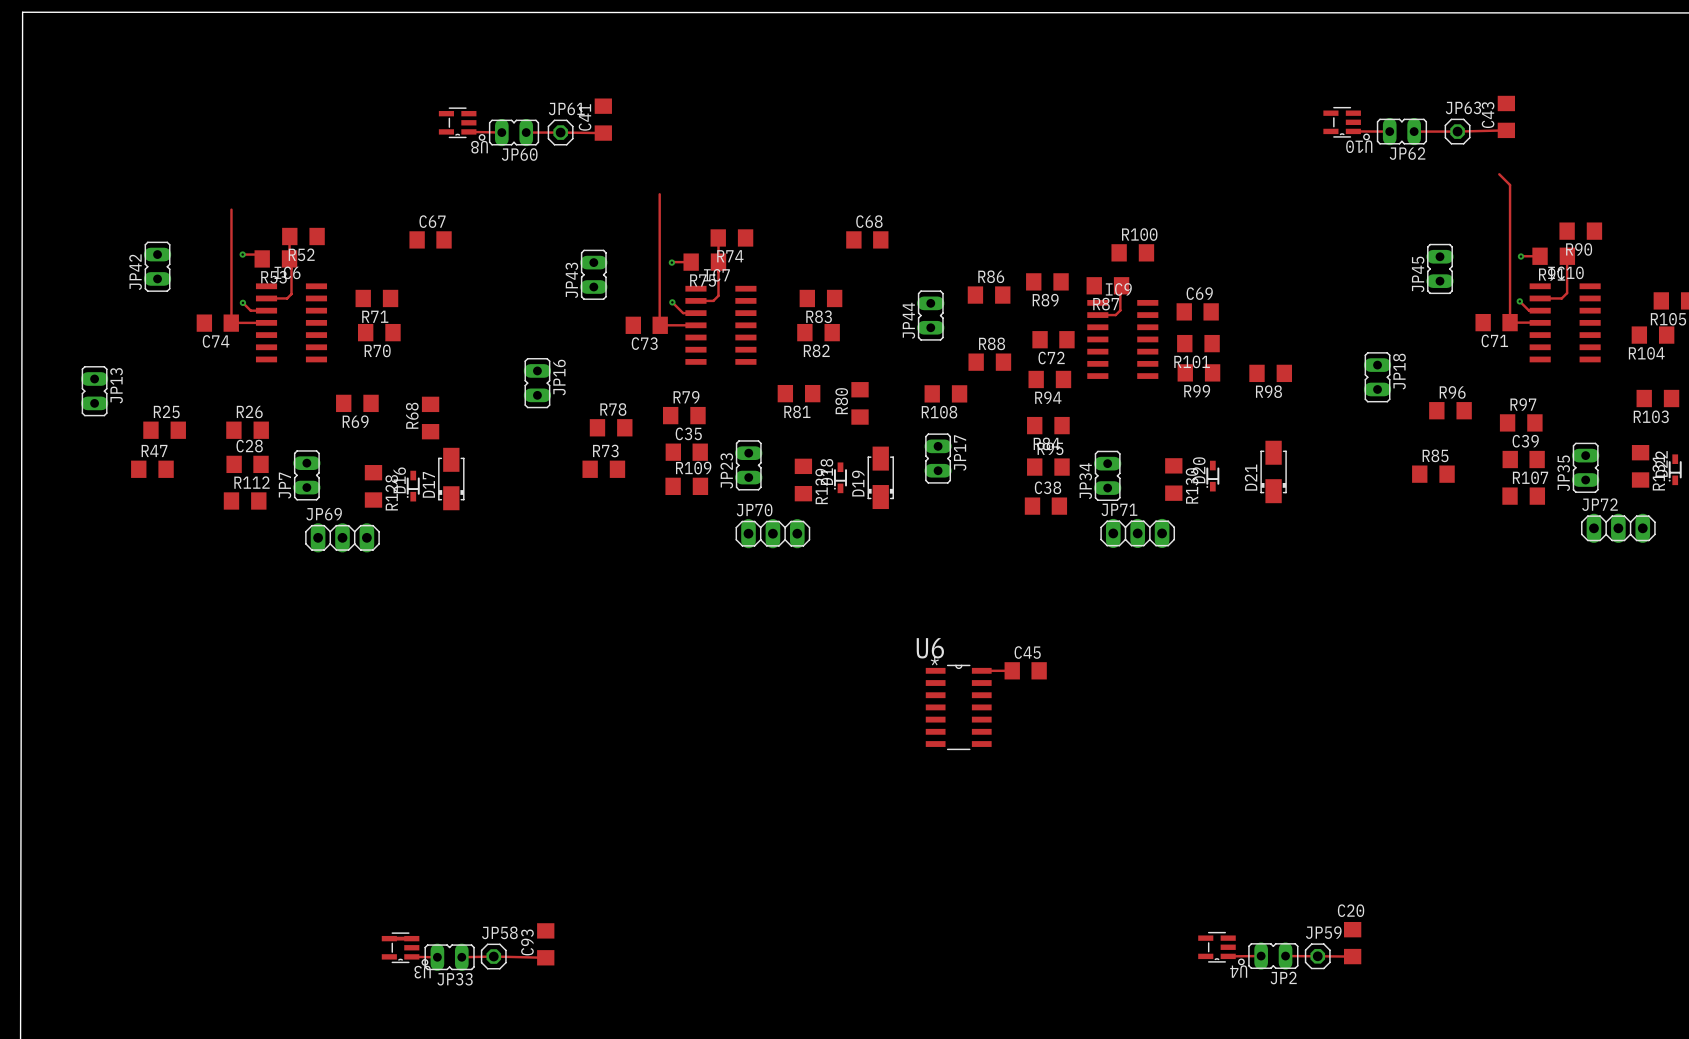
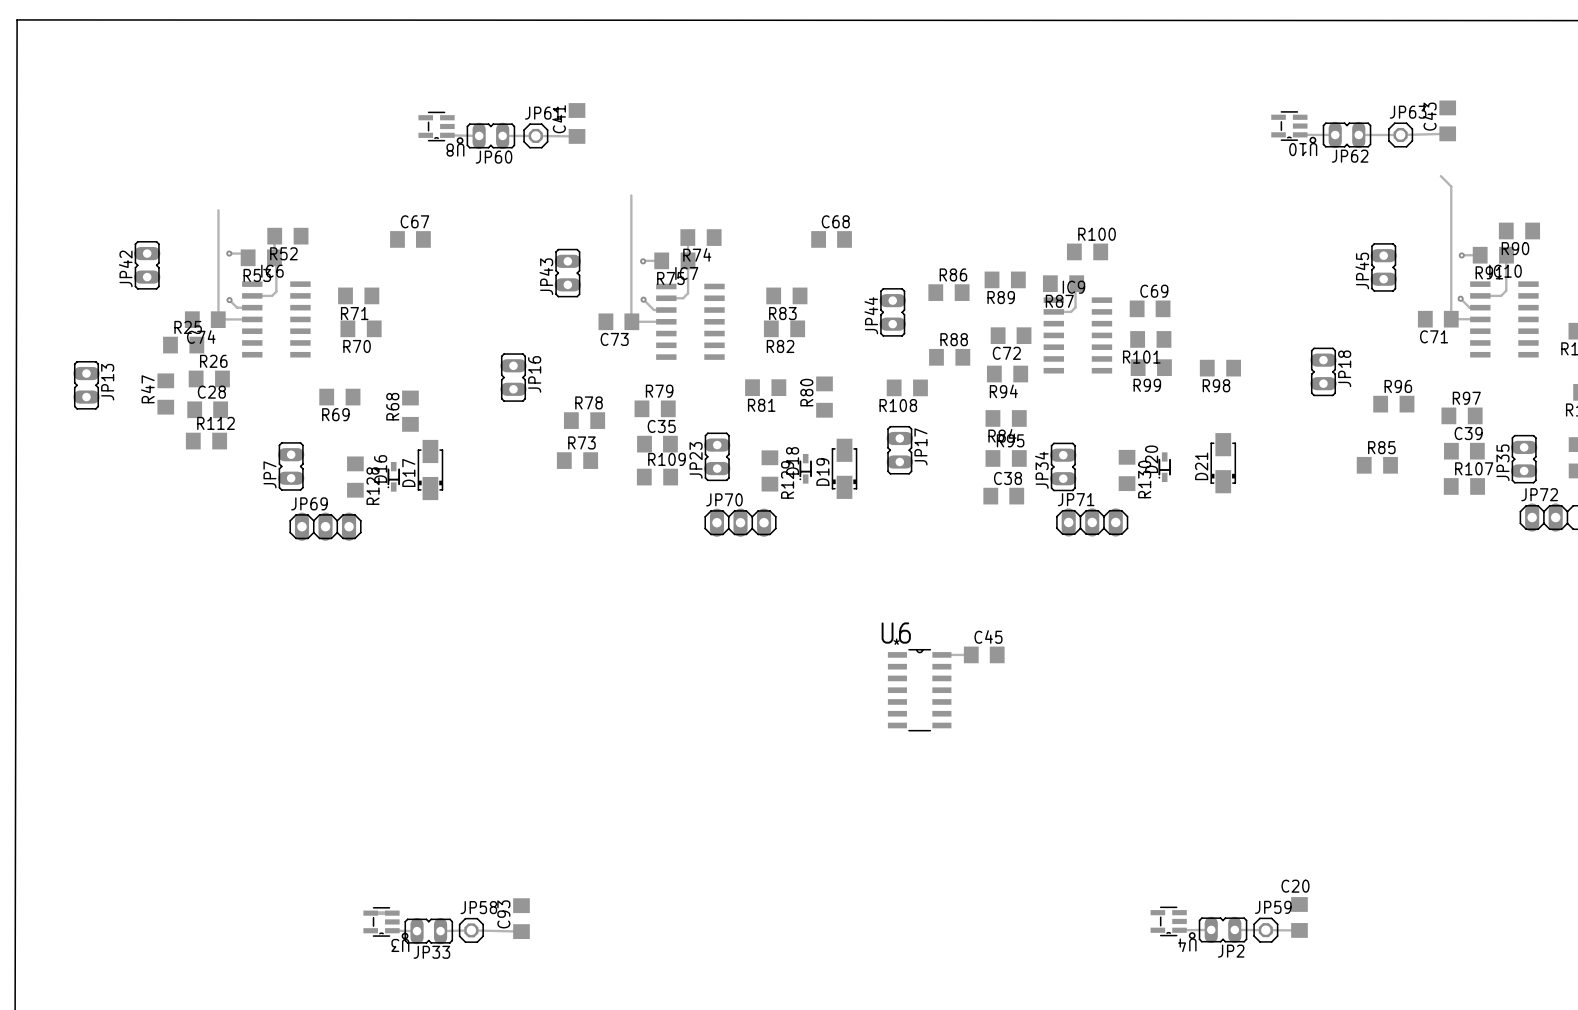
R25 position: (164, 430) -> (183, 345)
R26 position: (247, 430) -> (209, 378)
R47 name position: R47 (154, 450) -> R47 (147, 389)
C28 position: (247, 464) -> (207, 409)
R47 rotation: 0° (152, 469) -> 90° clockwise (165, 394)
R47 position: (152, 469) -> (165, 394)
R112 position: (245, 500) -> (206, 441)

